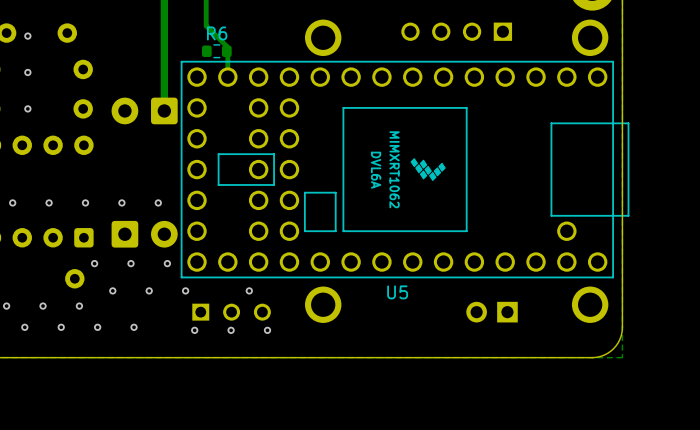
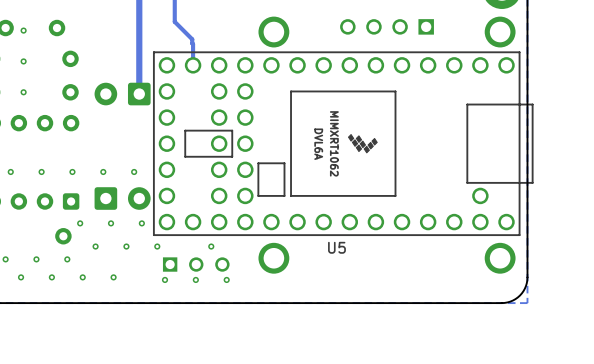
R6: (216, 51) -> none
part: (492, 312) -> none

